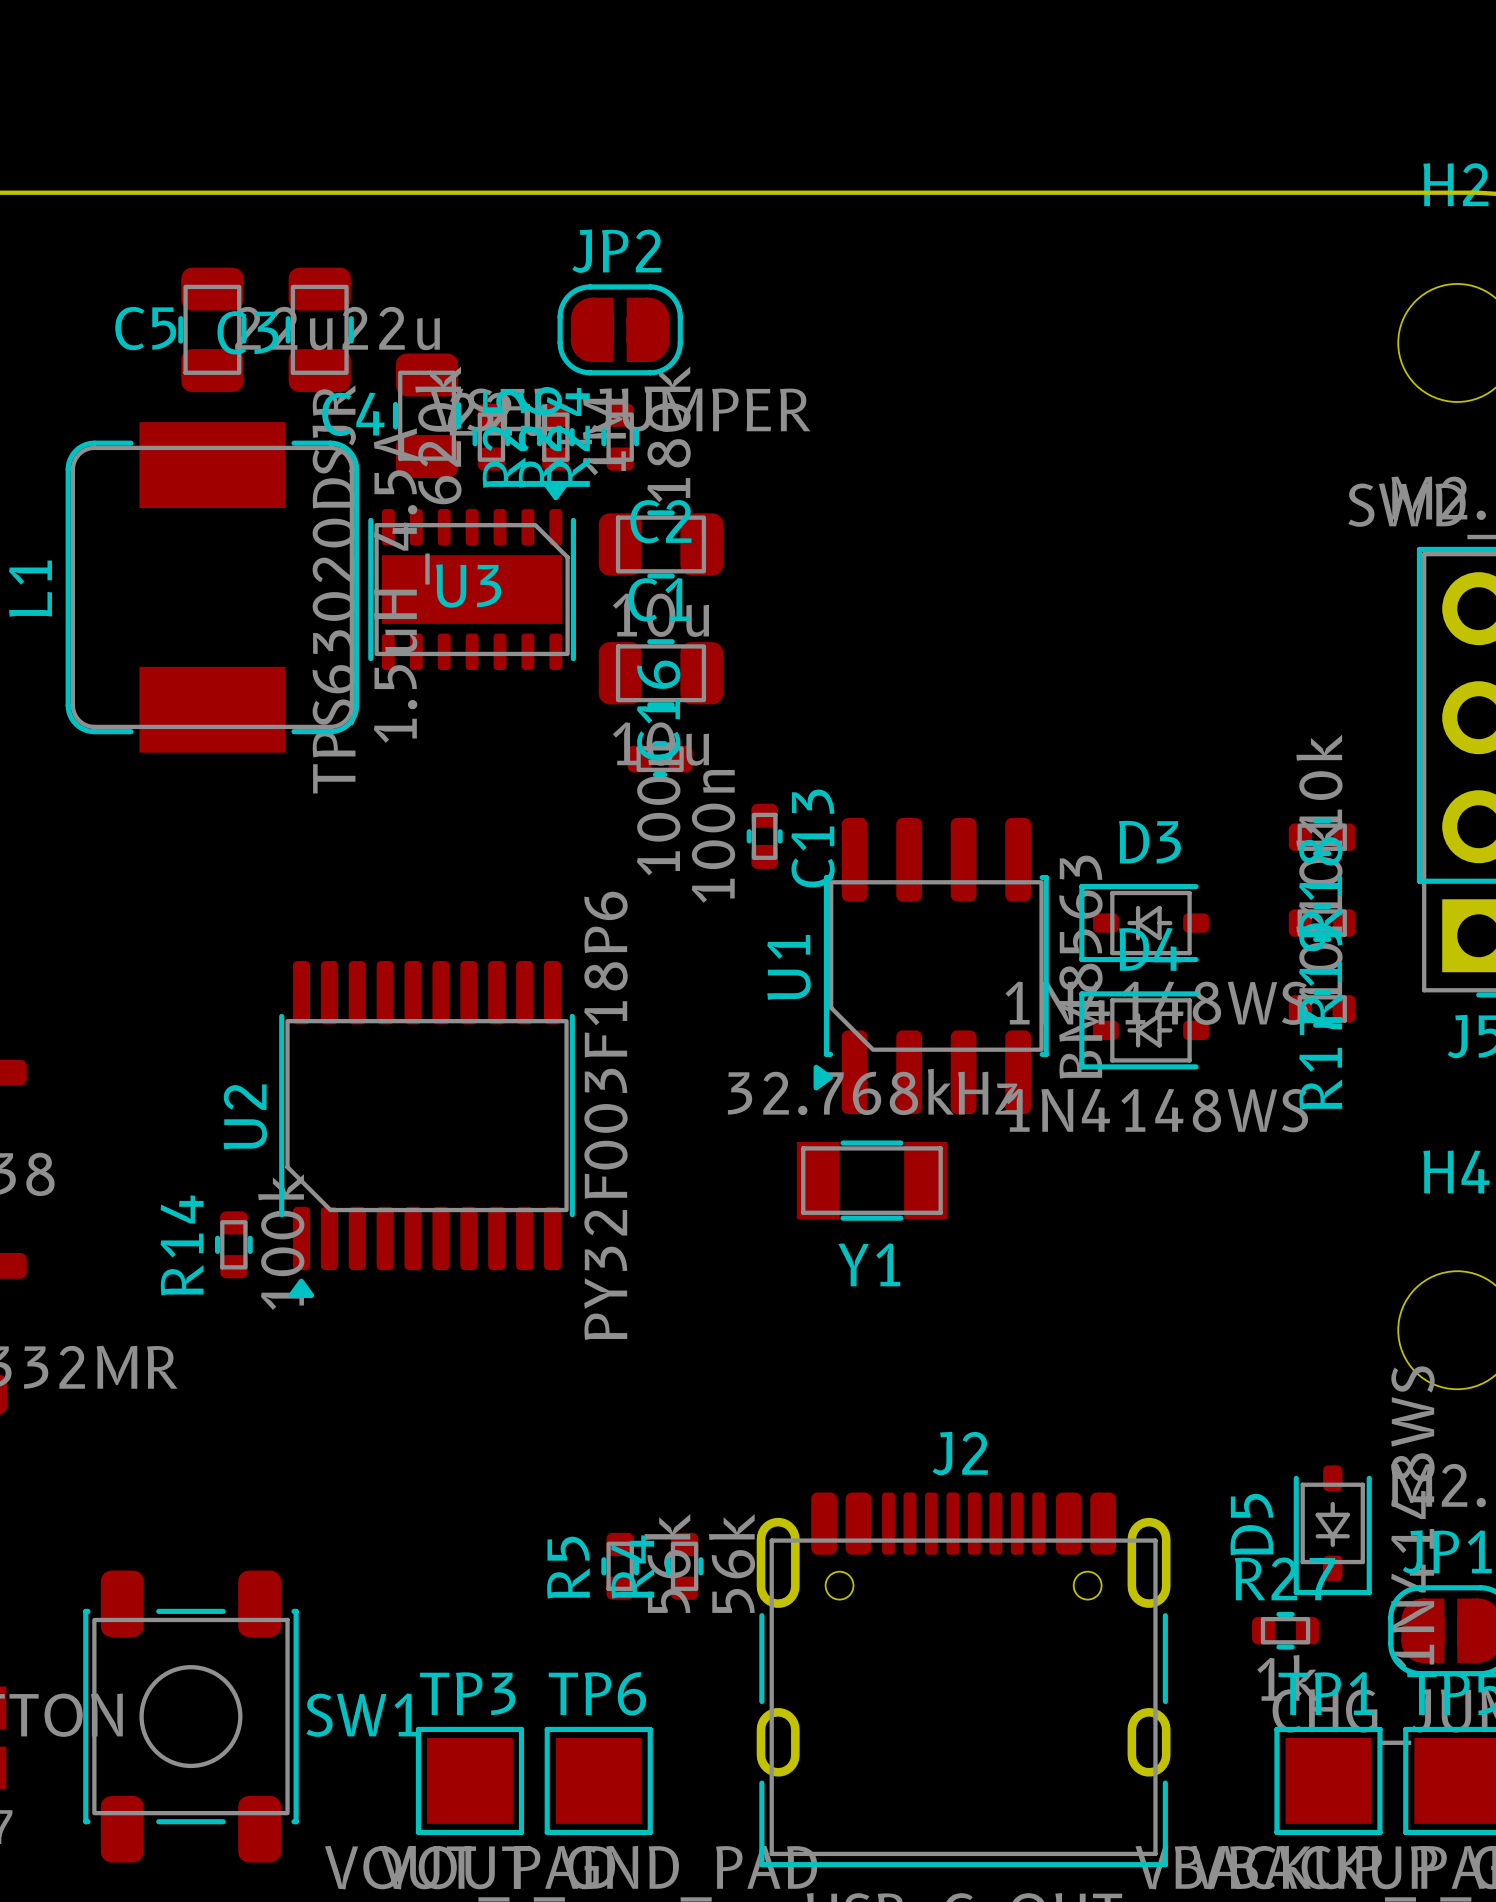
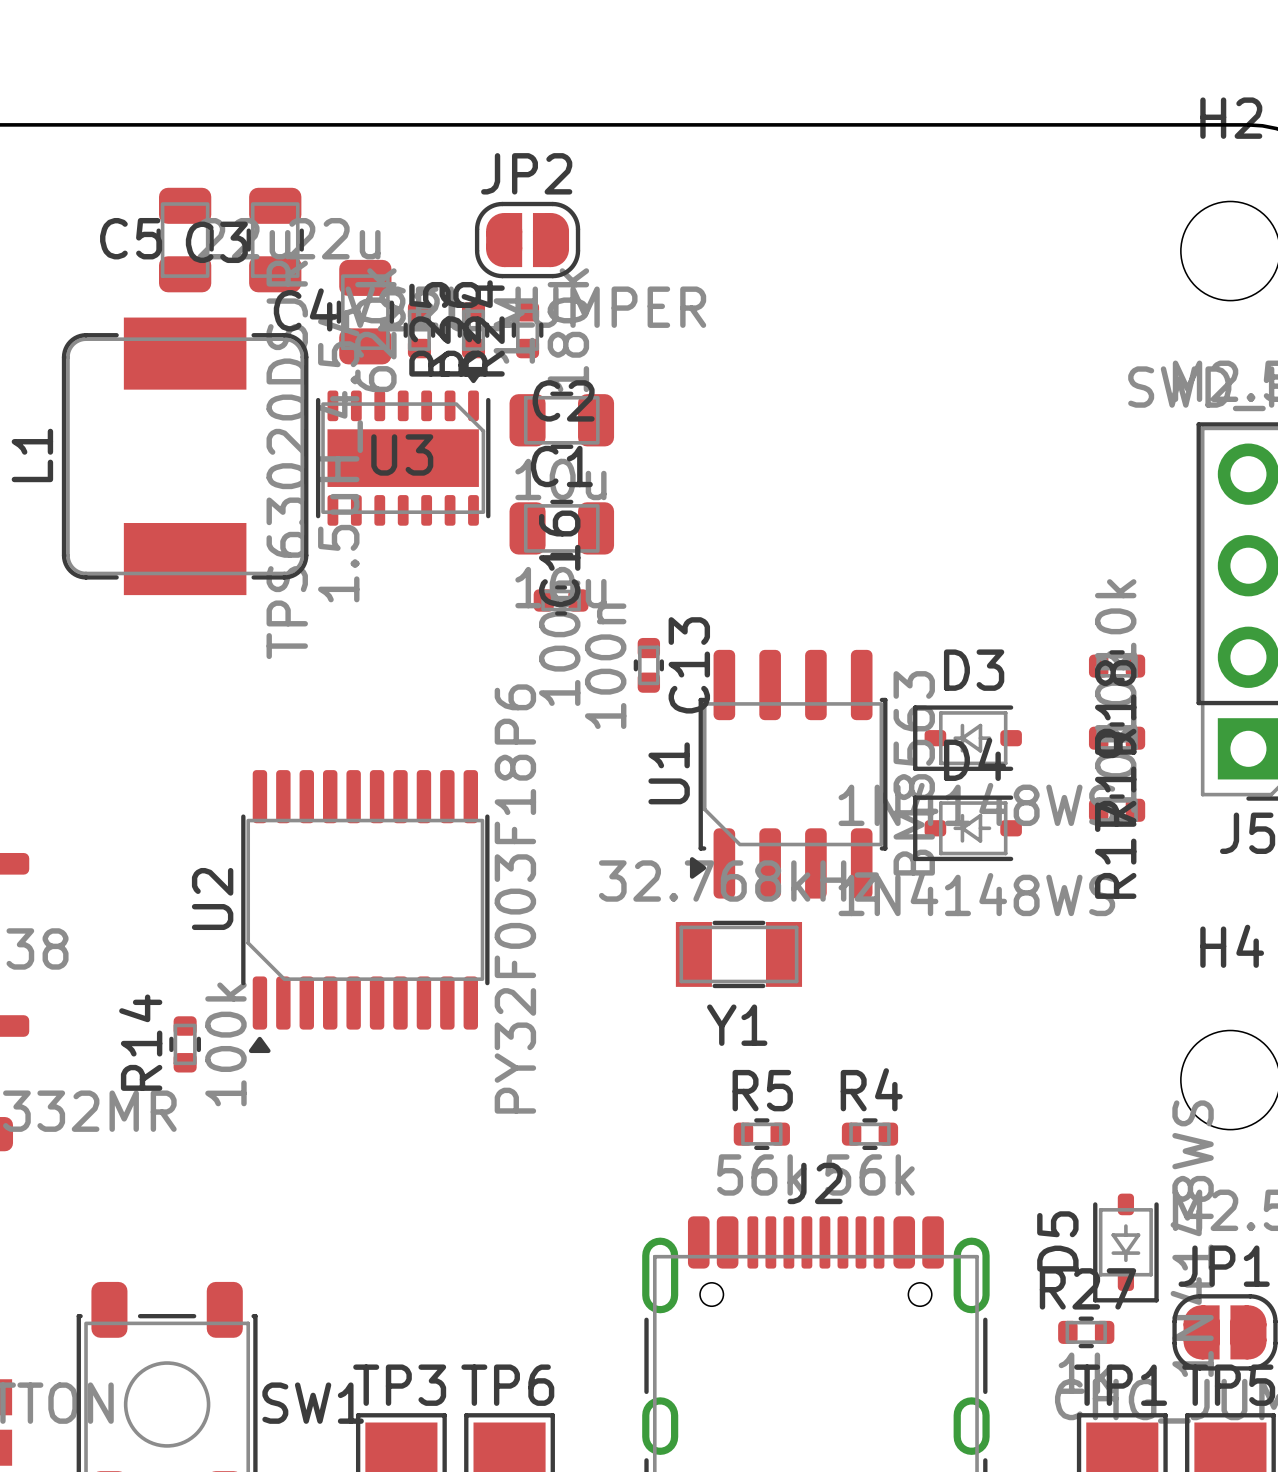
R14 position: (233, 1244) -> (185, 1044)
R5 rotation: 0° (620, 1566) -> 90° clockwise (761, 1134)
R5 position: (620, 1566) -> (761, 1134)
R4 rotation: 0° (684, 1566) -> 90° clockwise (869, 1134)
R4 position: (684, 1566) -> (869, 1134)

